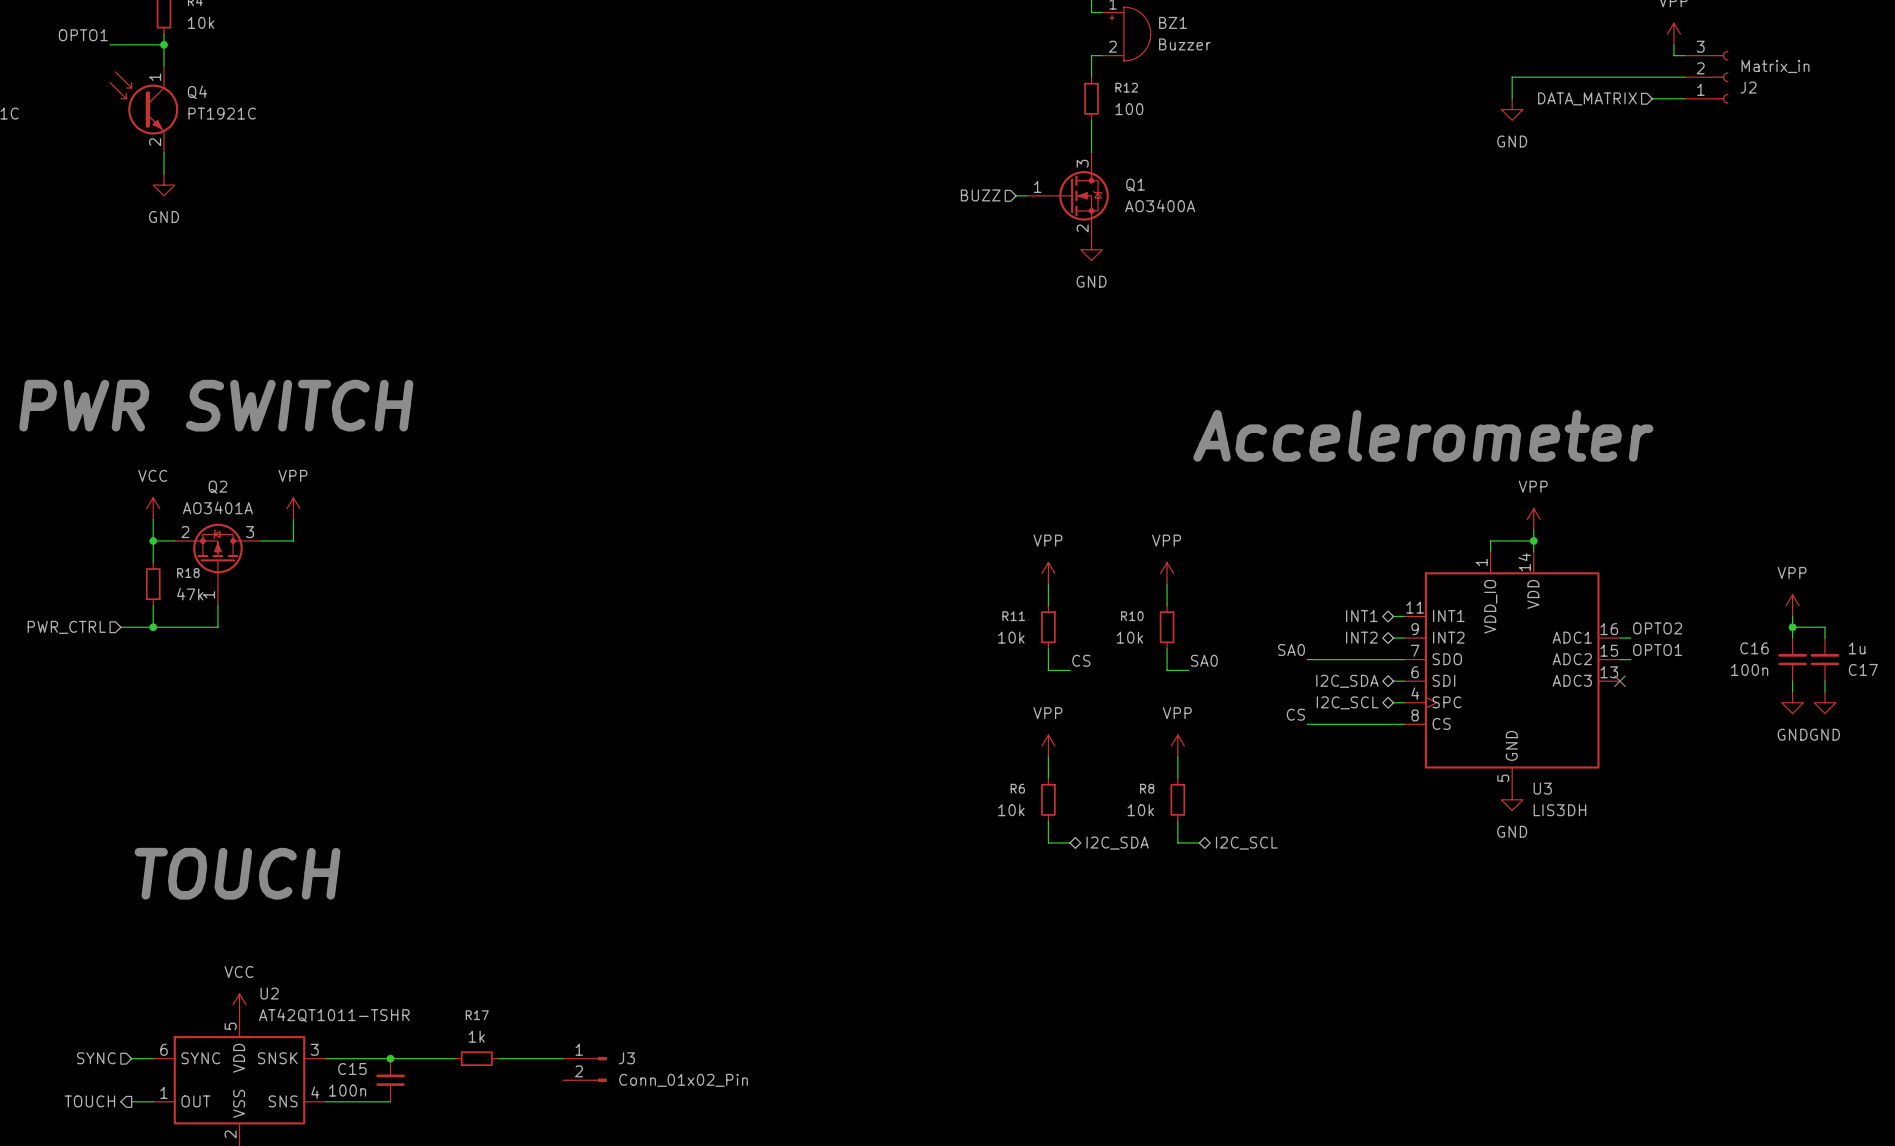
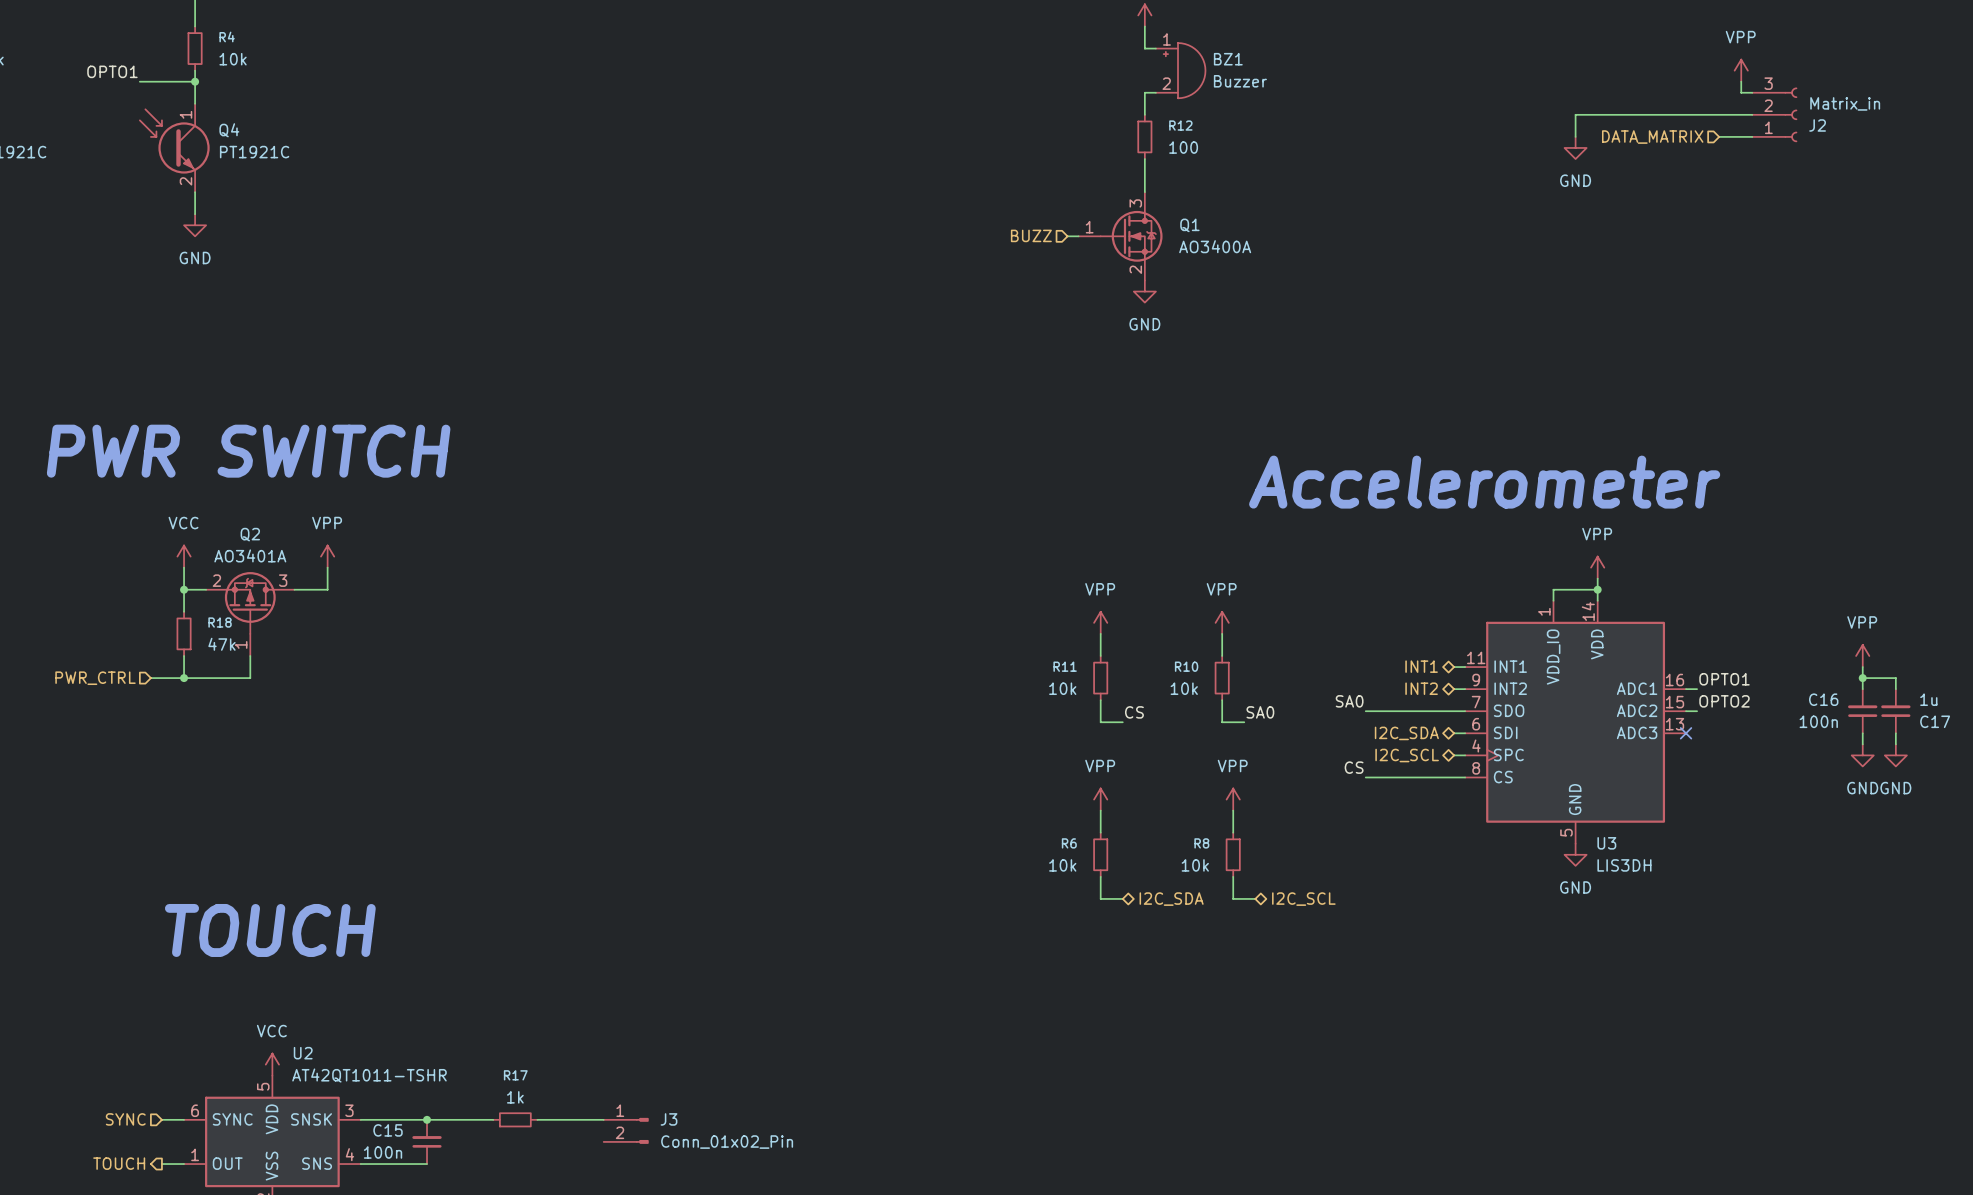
label: OPTO2 (1657, 628) -> OPTO1 (1724, 679)
label: OPTO1 (1657, 649) -> OPTO2 (1724, 701)

